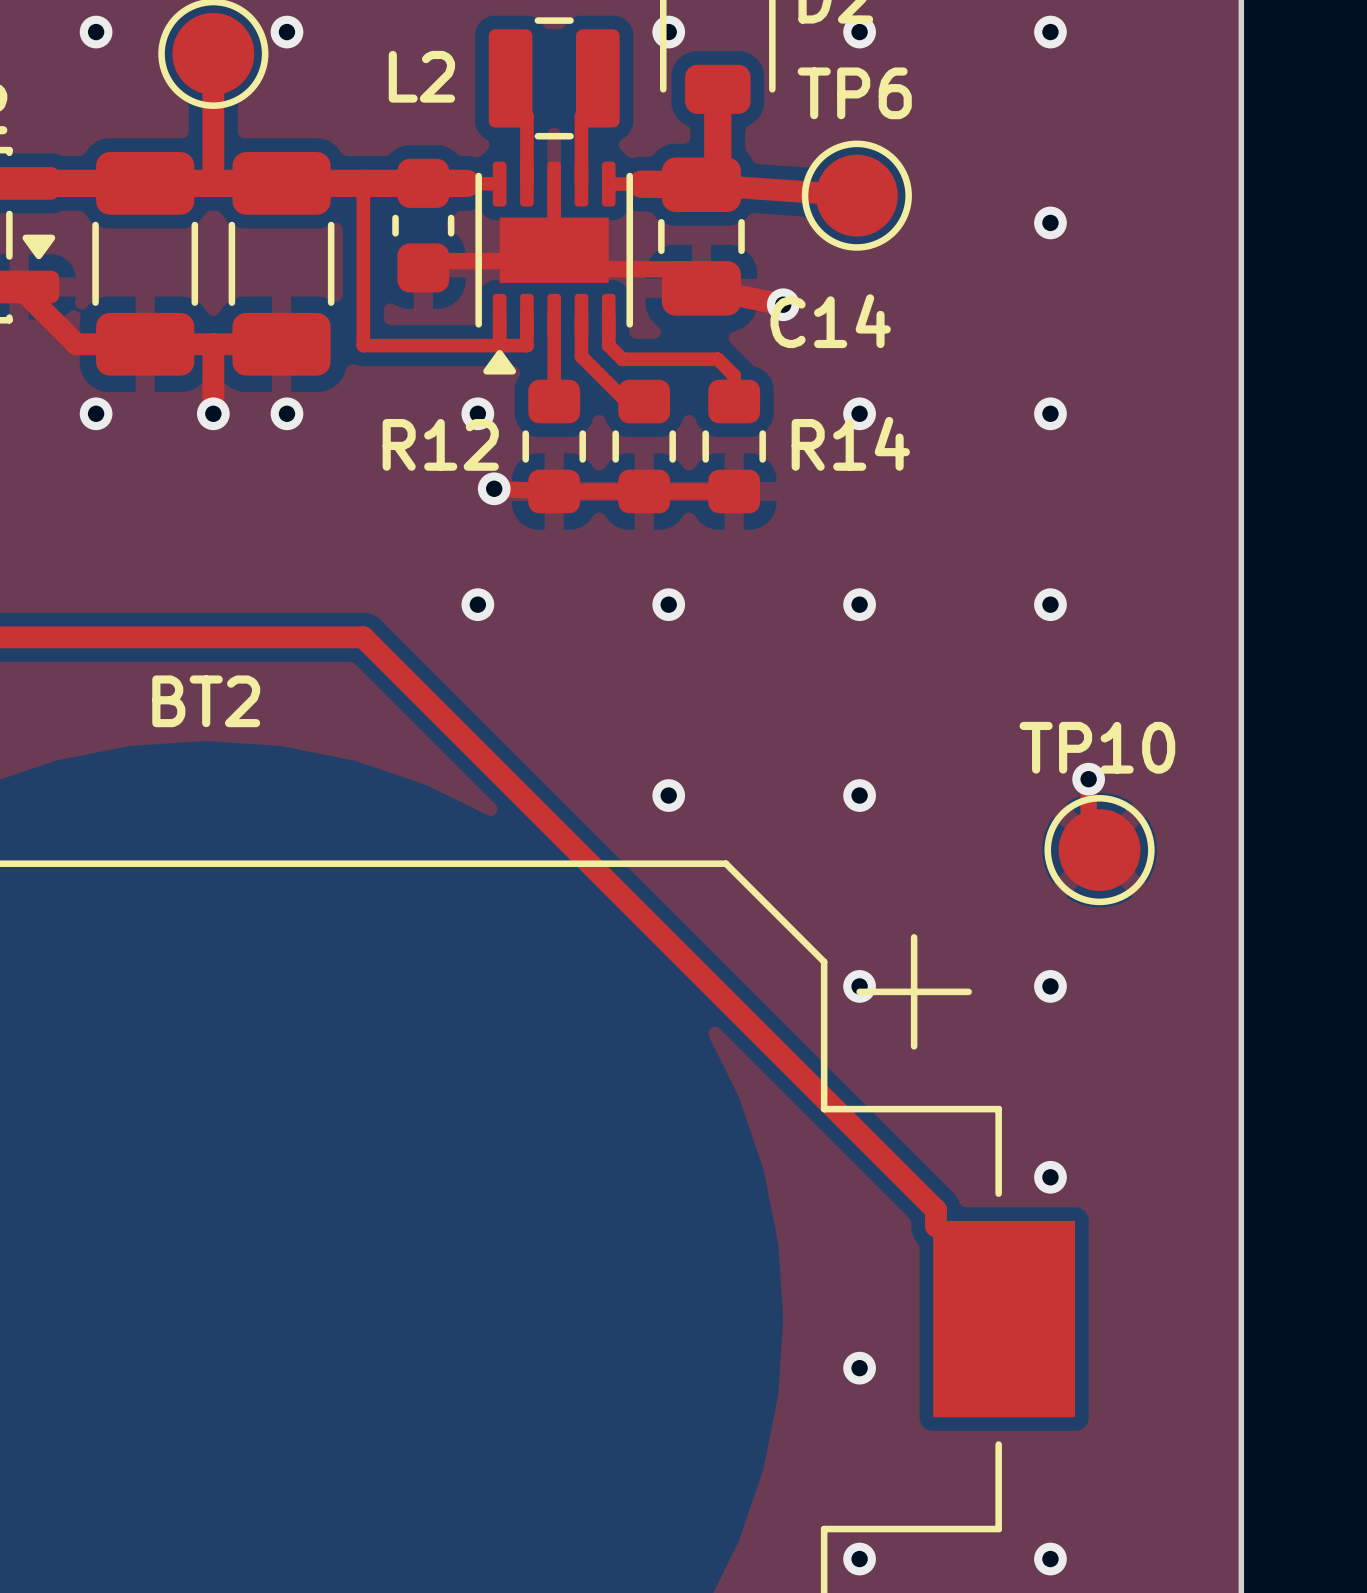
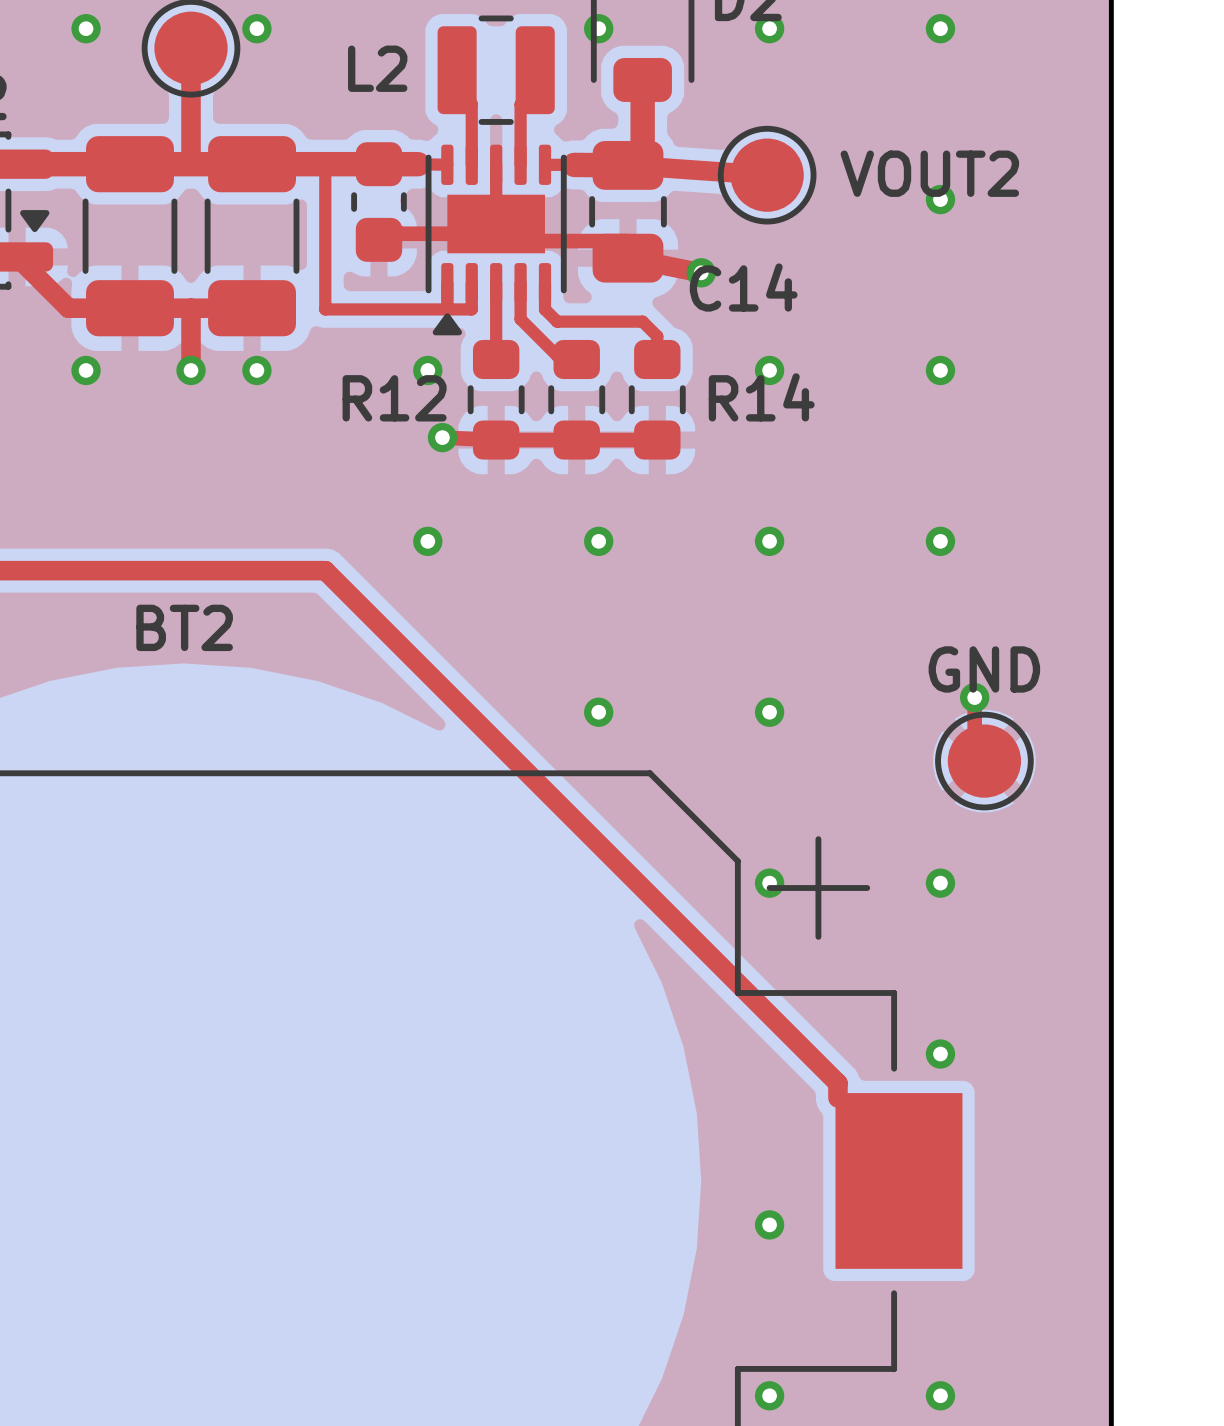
TP6 name: TP6 (854, 93) -> none
TP6 value: none -> VOUT2 (929, 173)
TP10 name: TP10 (1097, 747) -> none
TP10 value: none -> GND (984, 669)

